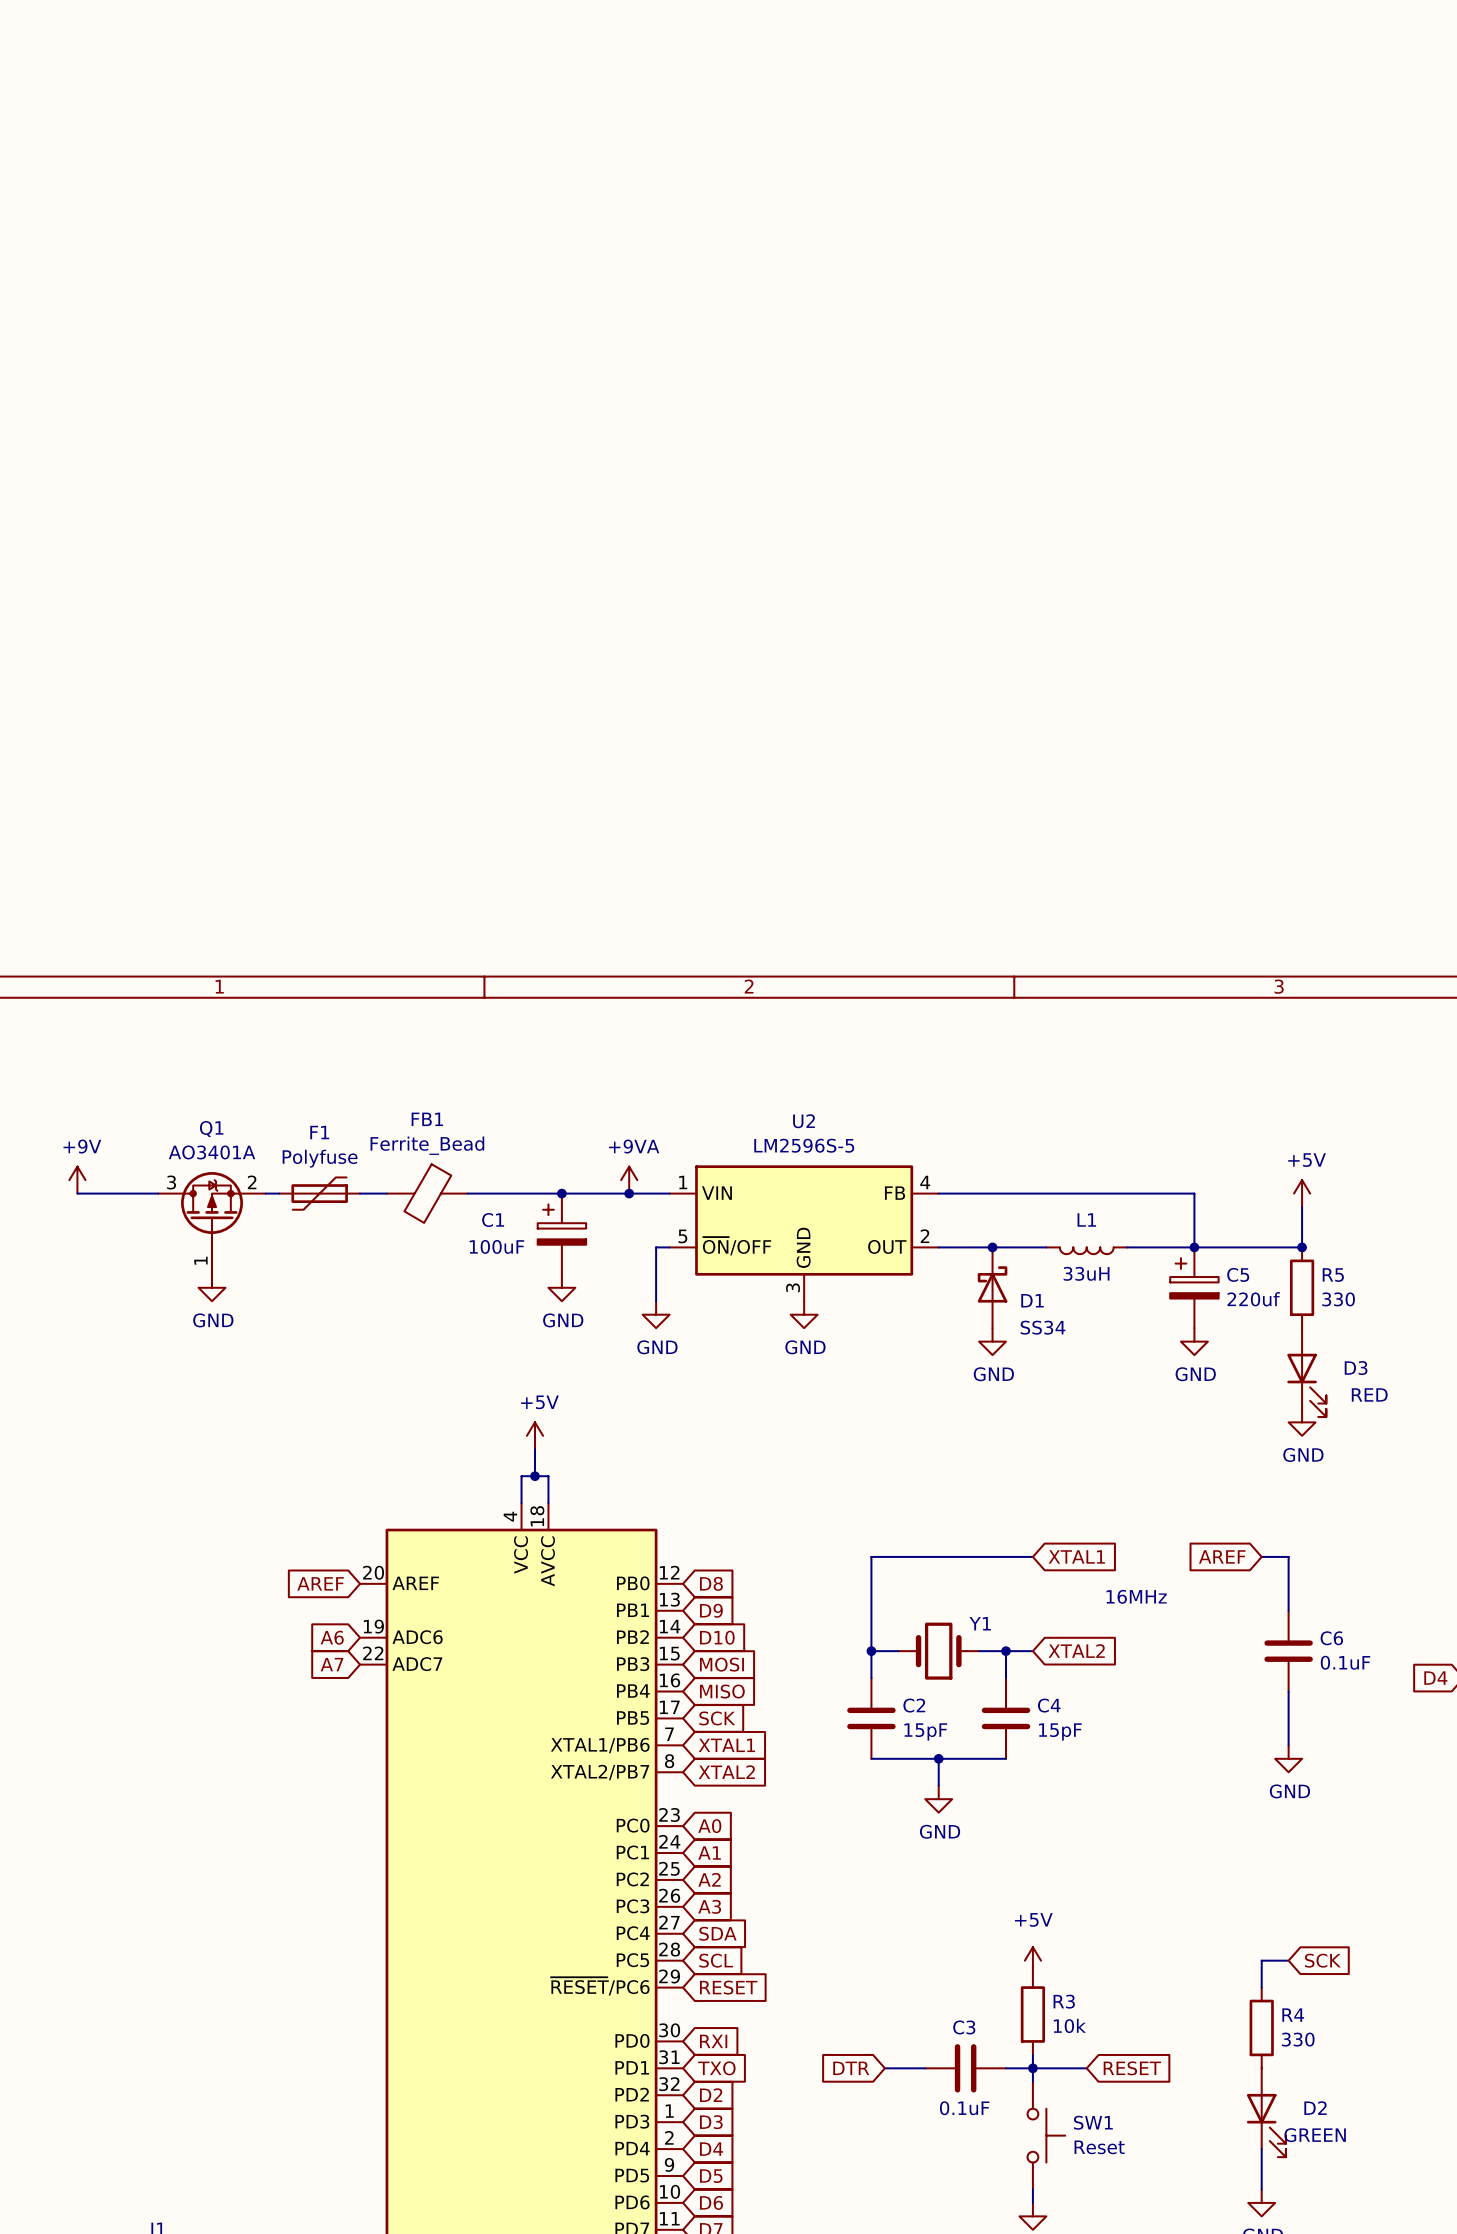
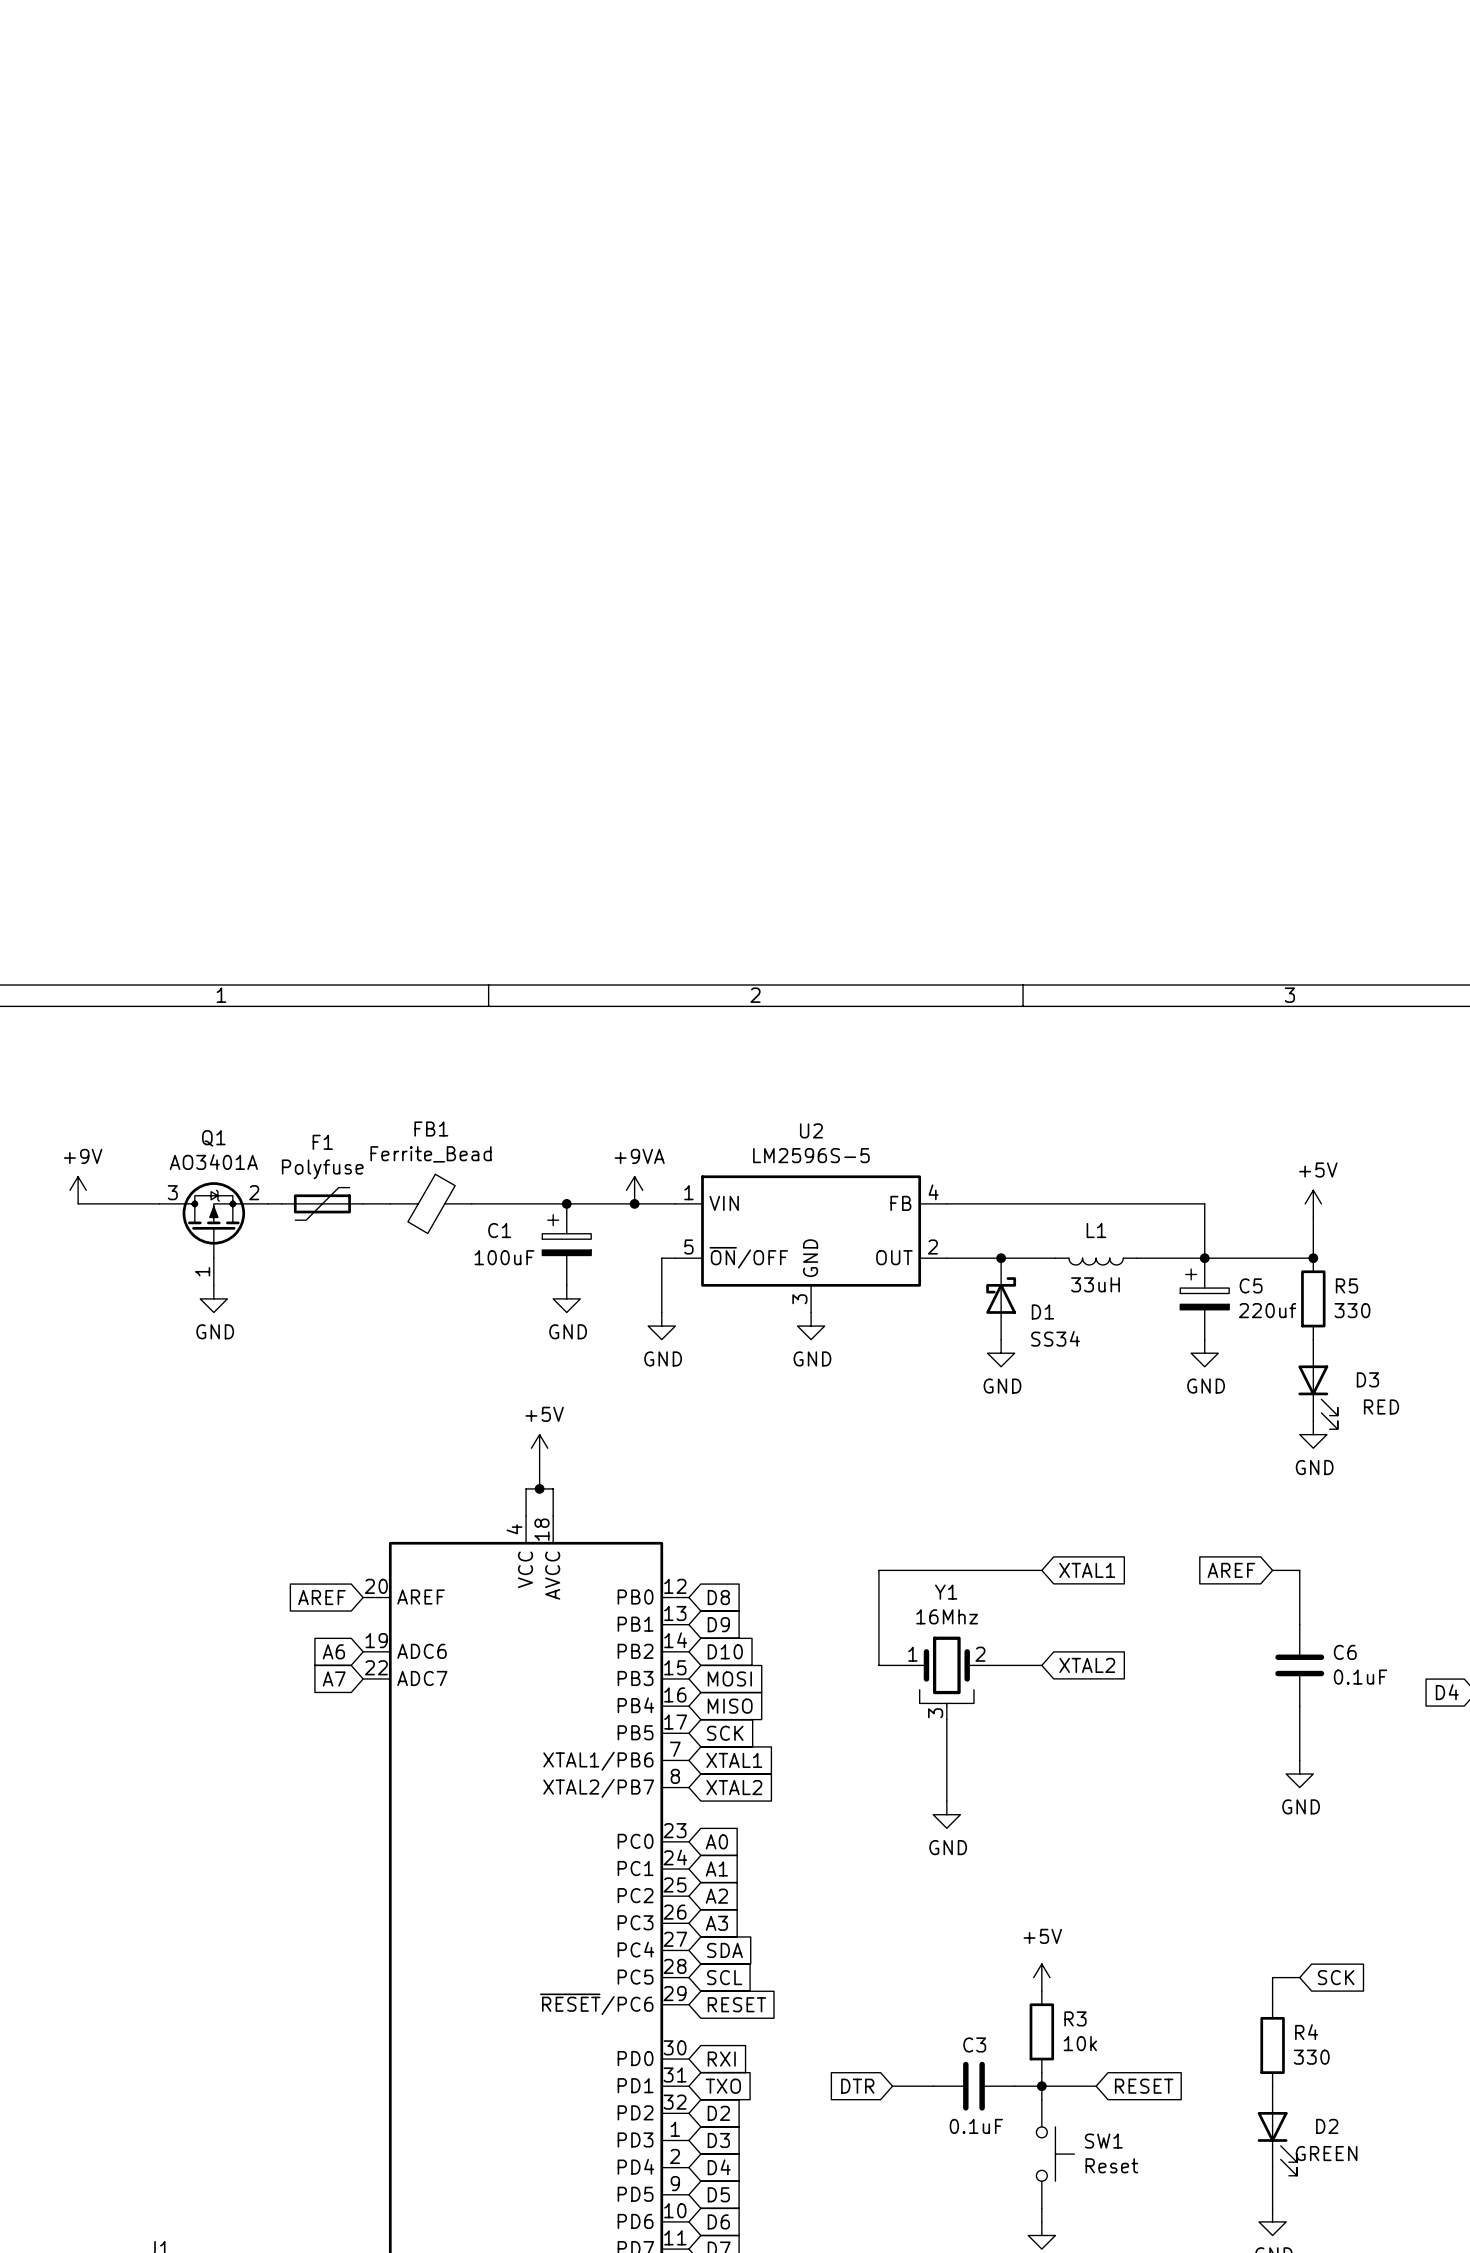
Y1 value: 16MHz (1136, 1596) -> 16Mhz (947, 1616)
Y1 symbol: [898, 1622, 980, 1680] -> [906, 1636, 988, 1720]
Y1 name position: Y1 (980, 1623) -> Y1 (946, 1592)
wire: (871, 1651) (871, 1678) -> none
junction: (871, 1651) -> none
wire: (1006, 1651) (1006, 1678) -> none
junction: (1006, 1651) -> none
wire: none -> (946, 1719) (946, 1773)
C2: 15pF (871, 1718) -> none
C4: 15pF (1006, 1718) -> none
wire: (871, 1758) (1006, 1758) -> none
junction: (938, 1758) -> none

